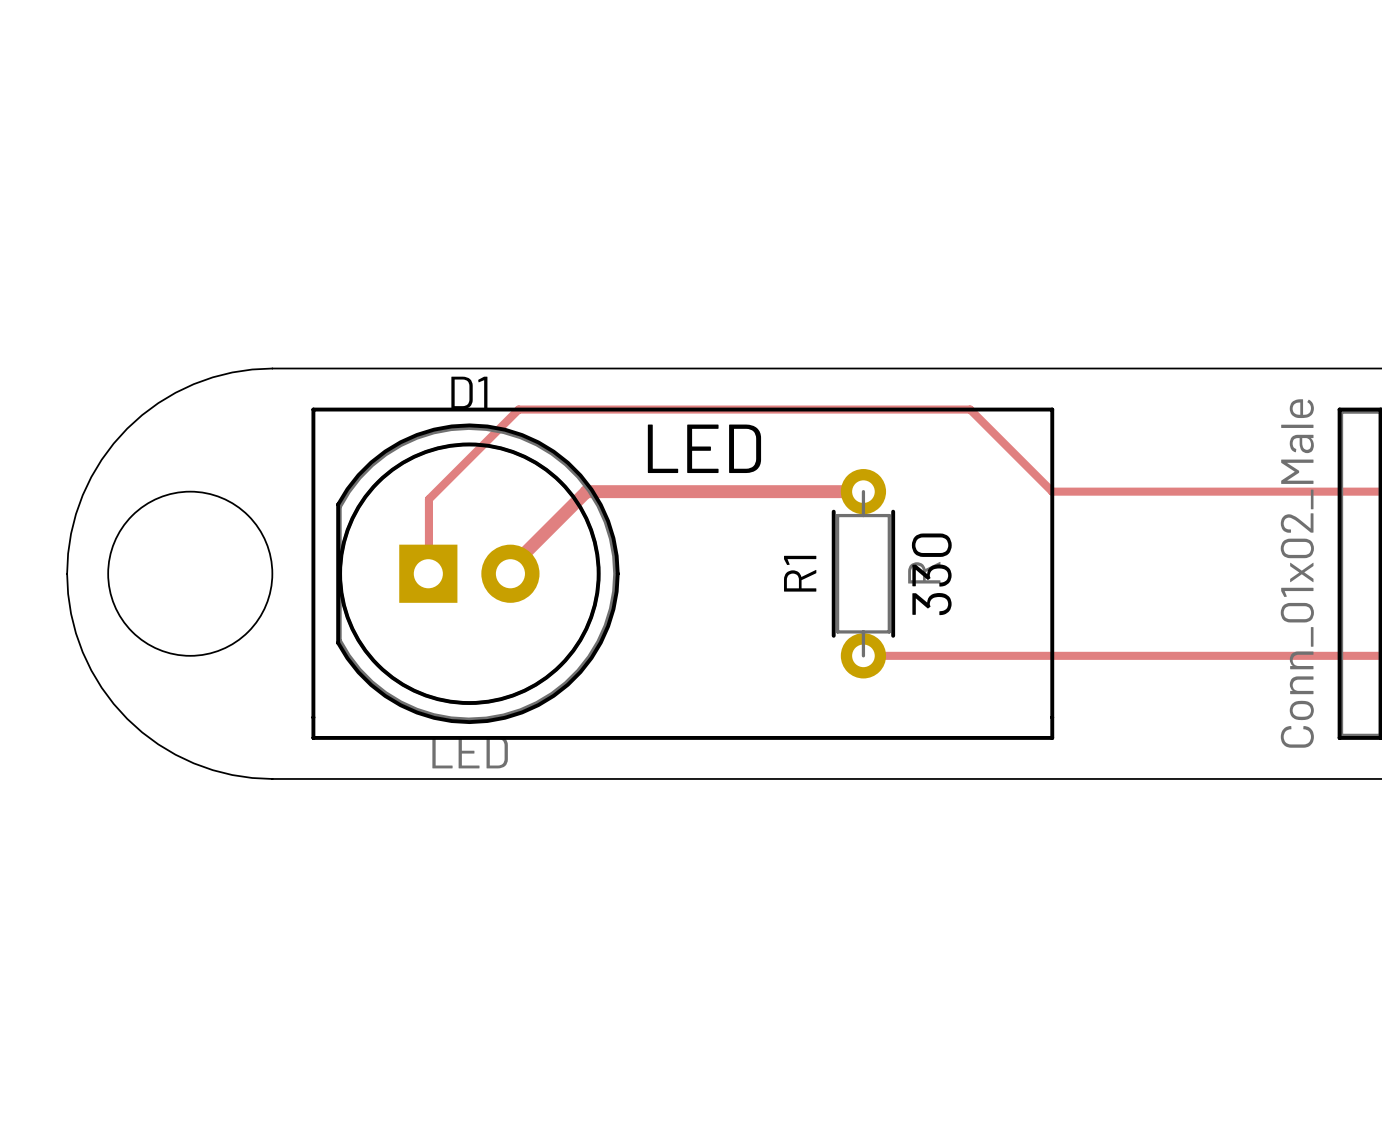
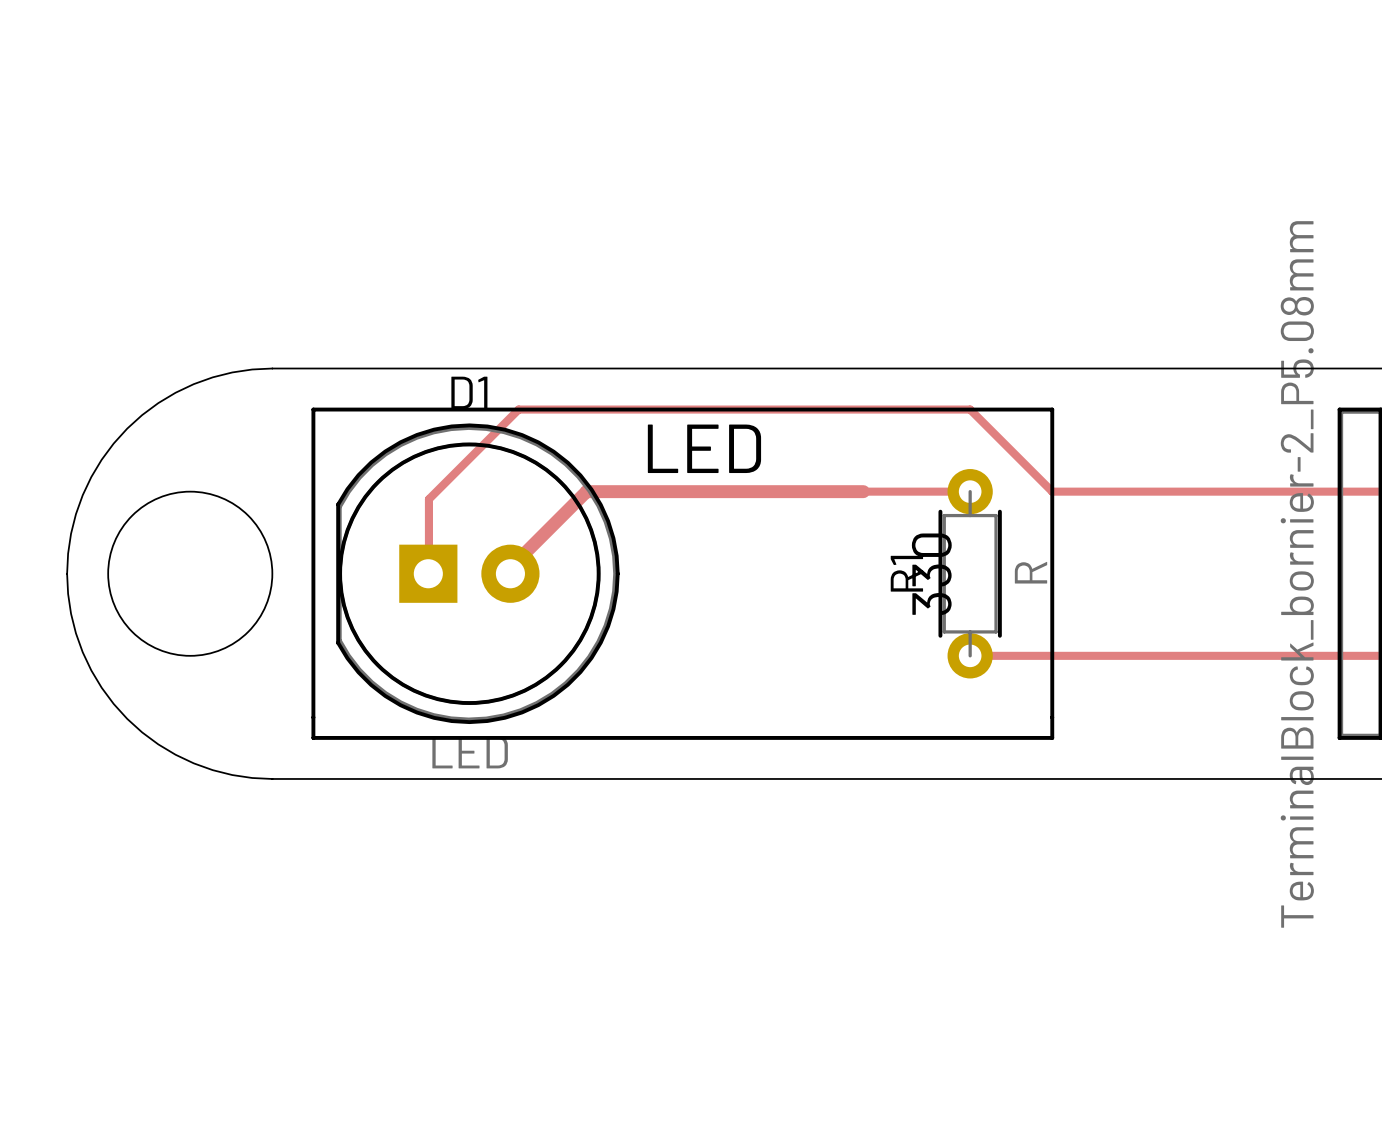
R1 position: (863, 573) -> (970, 573)
part value: Conn_01x02_Male (1297, 573) -> TerminalBlock_bornier-2_P5.08mm (1297, 574)
top track: (863, 655) (970, 655) -> (863, 491) (970, 491)

